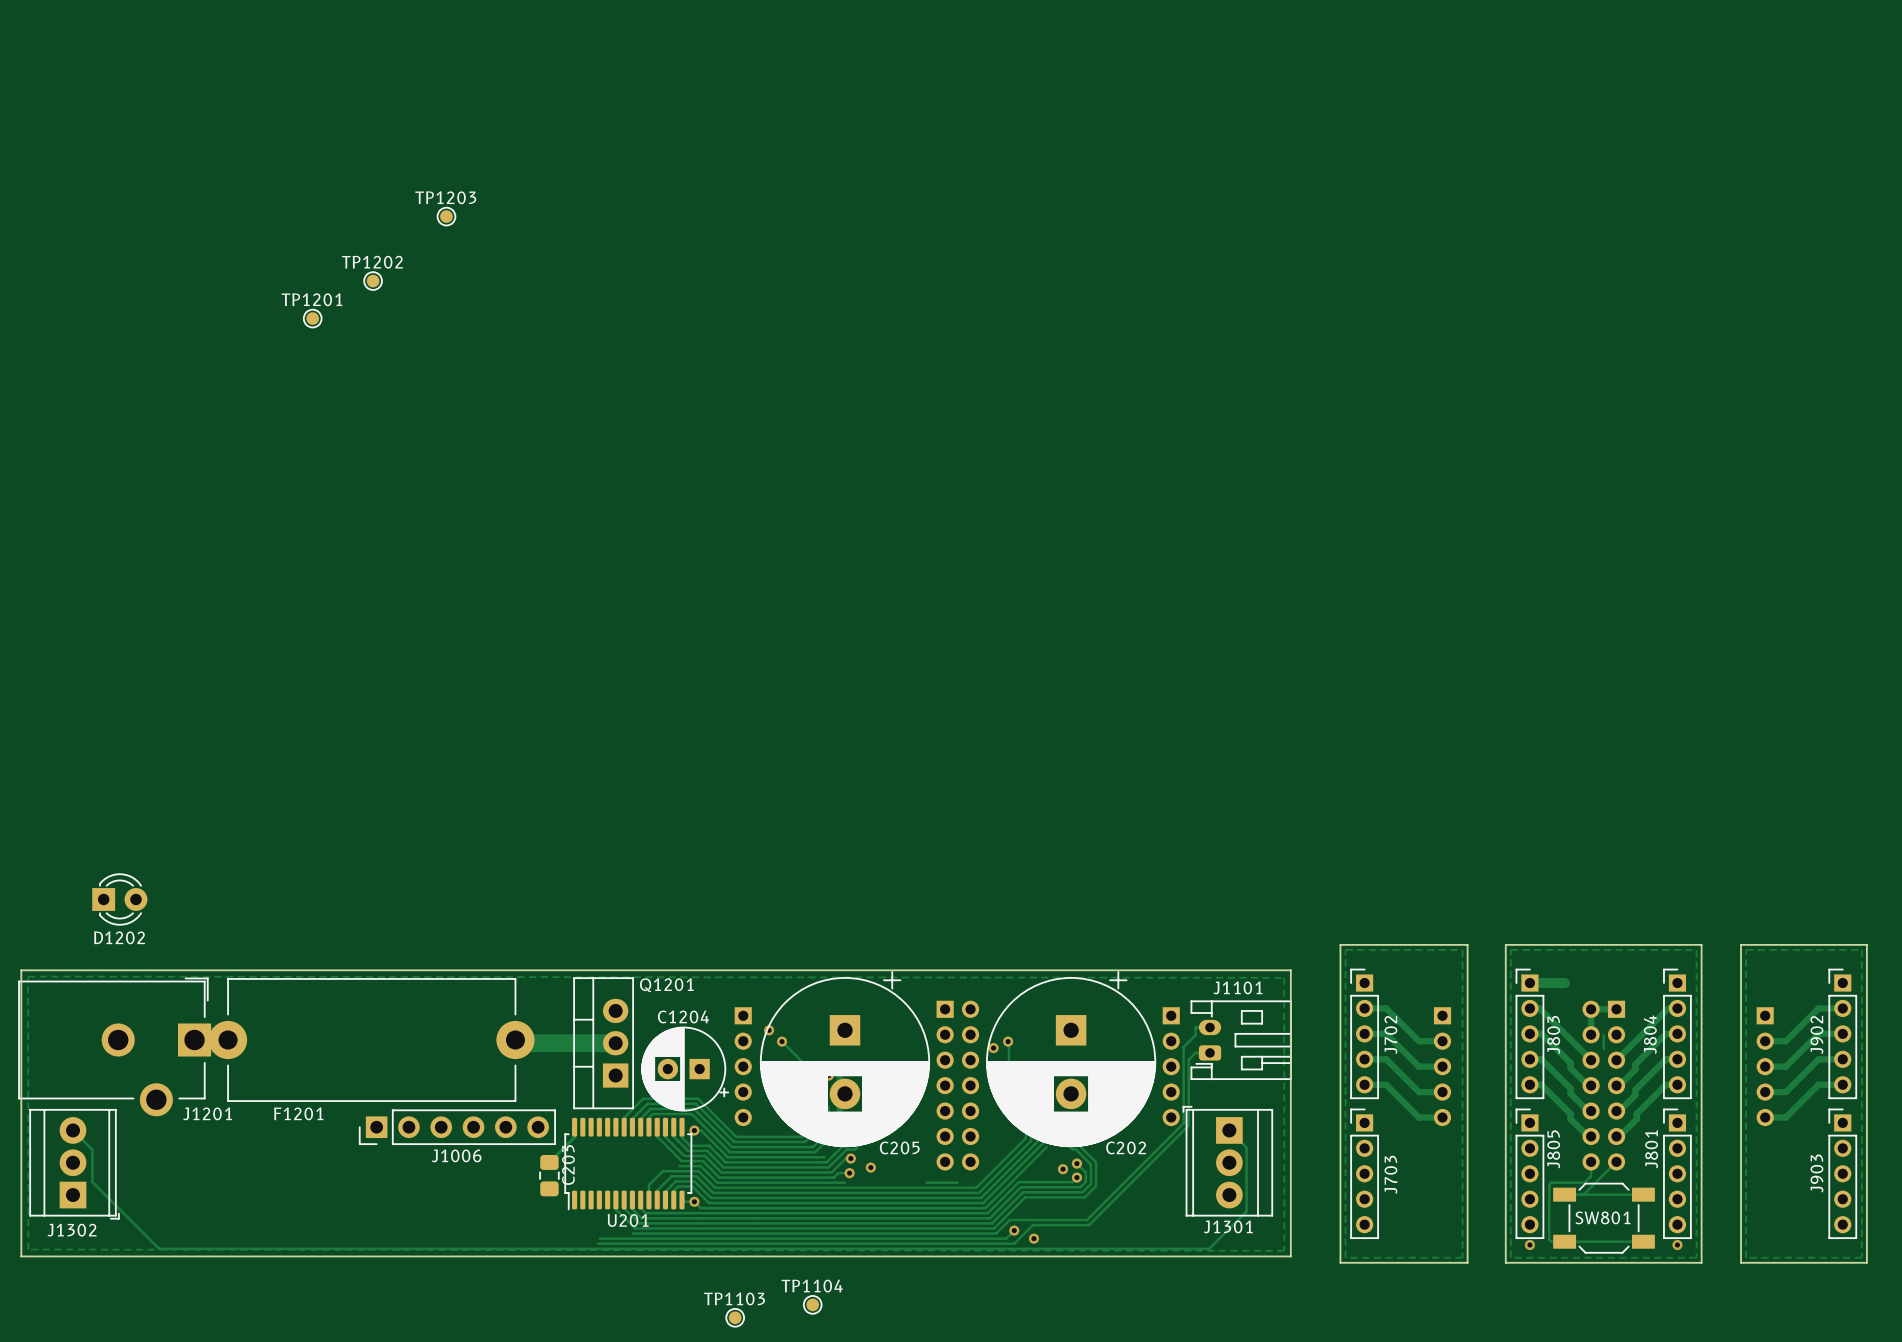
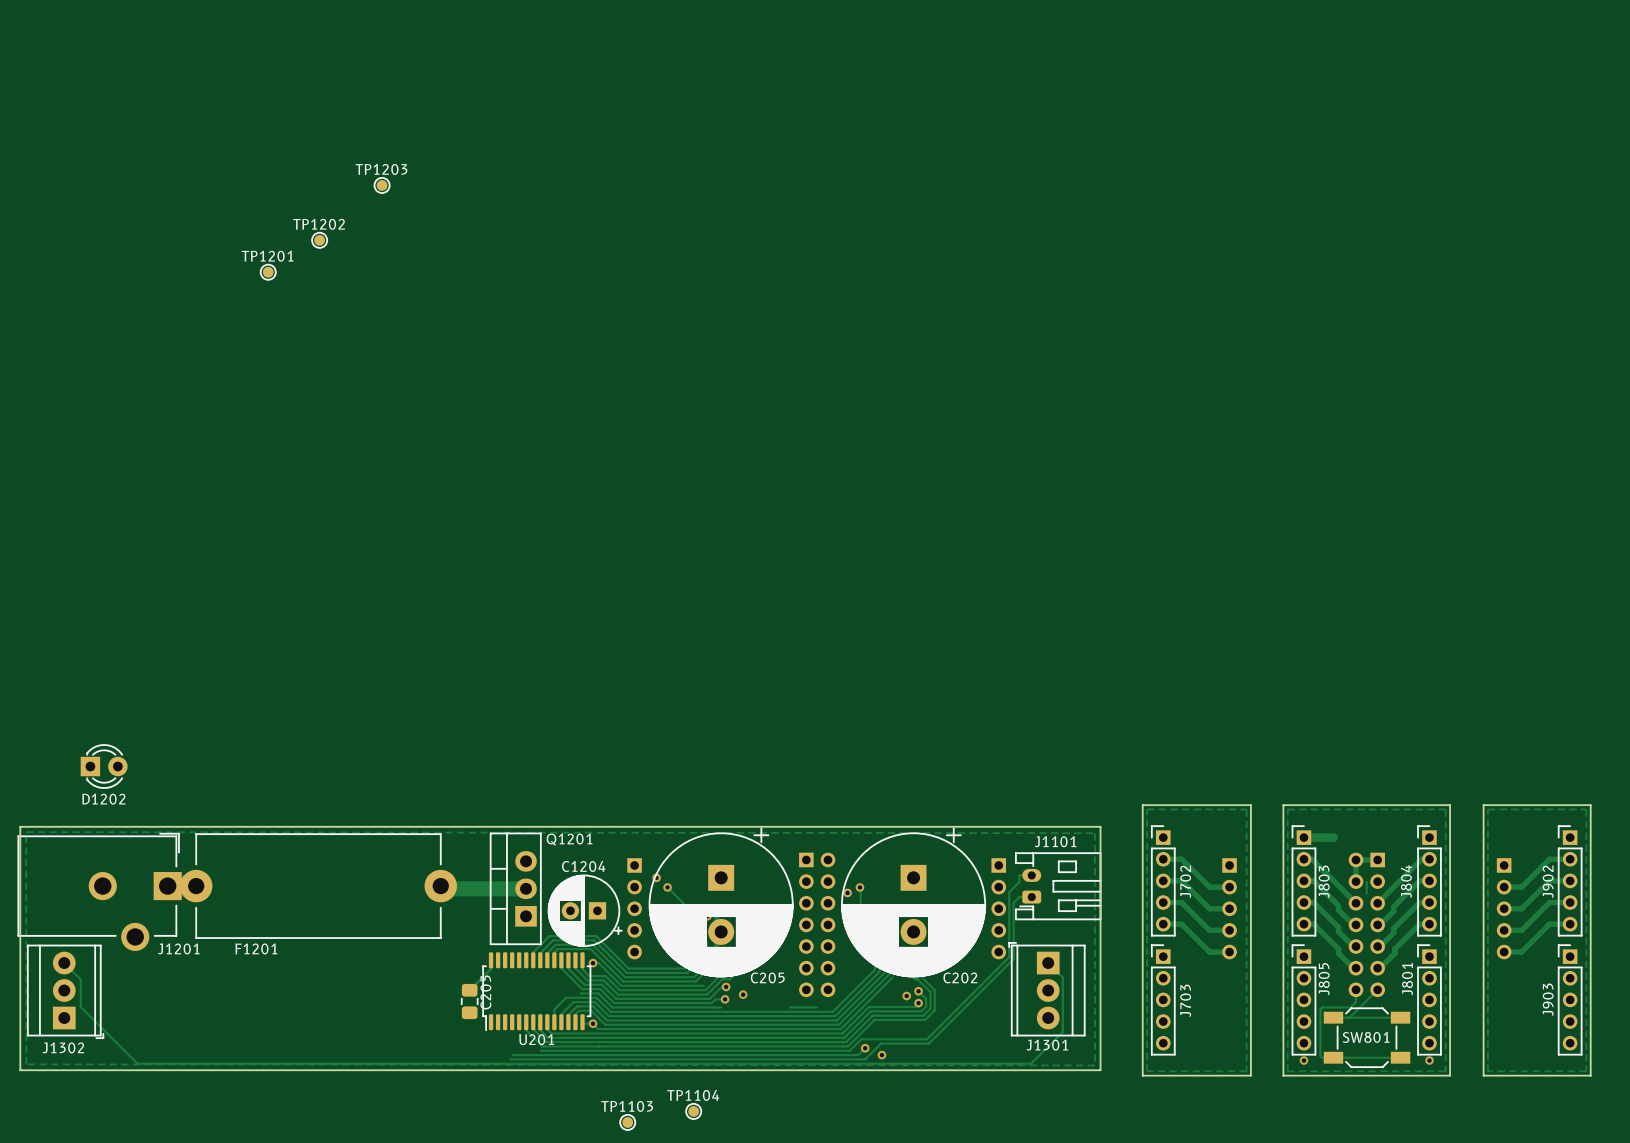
J1006: (457, 1127) -> none

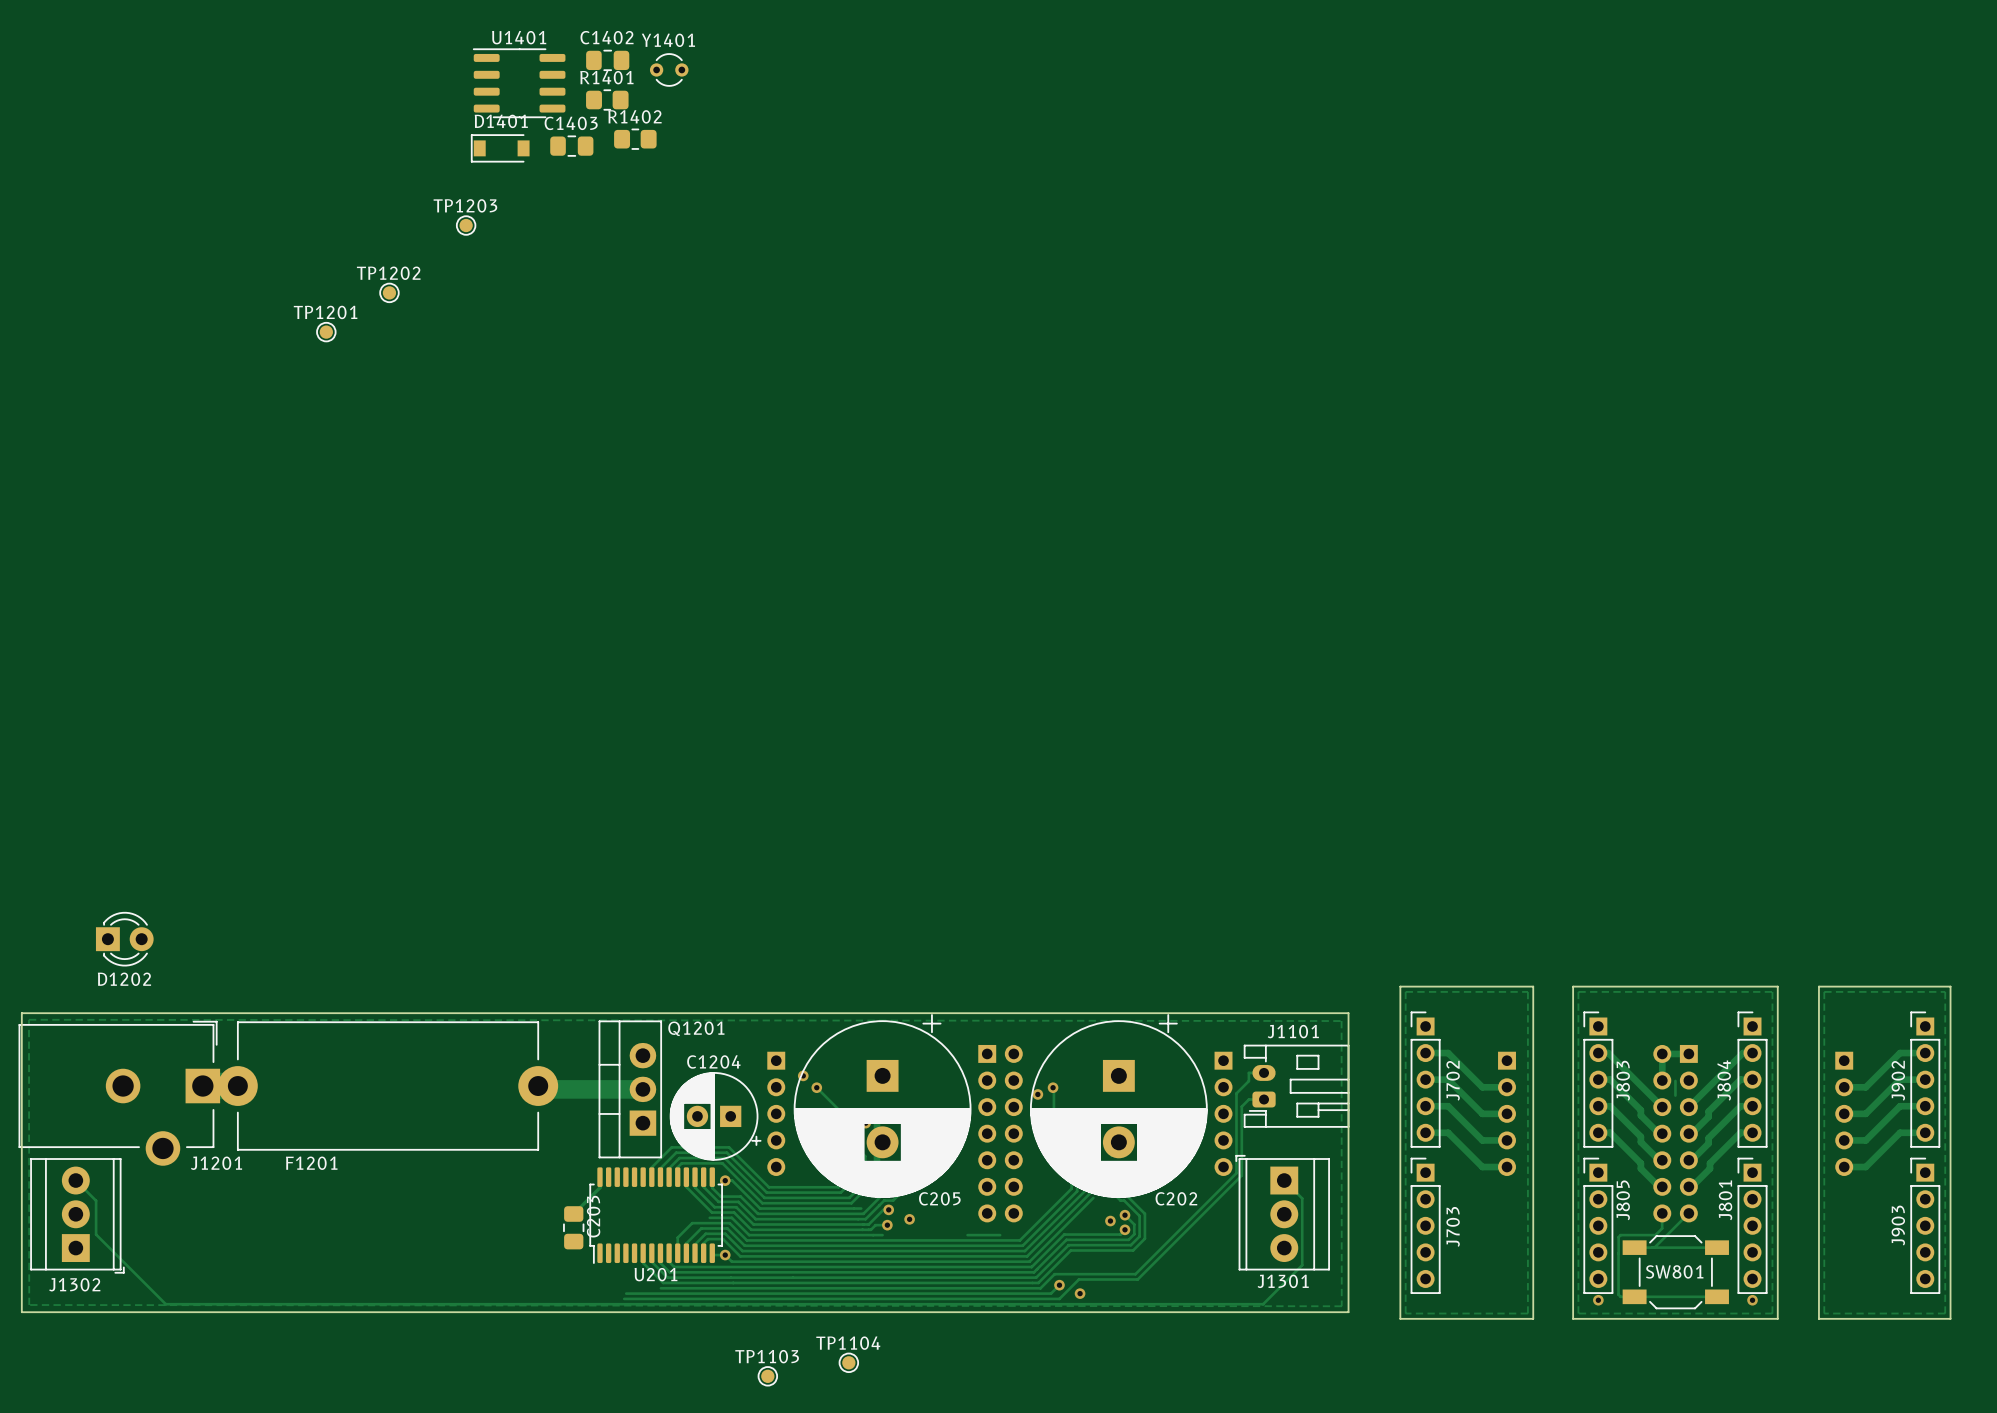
C1402: none -> (607, 60)
Y1401: none -> (669, 69)
U1401: none -> (519, 83)
R1401: none -> (607, 100)
R1402: none -> (635, 139)
C1403: none -> (571, 146)
D1401: none -> (500, 148)
track: (1303, 837) (1333, 837) -> none

